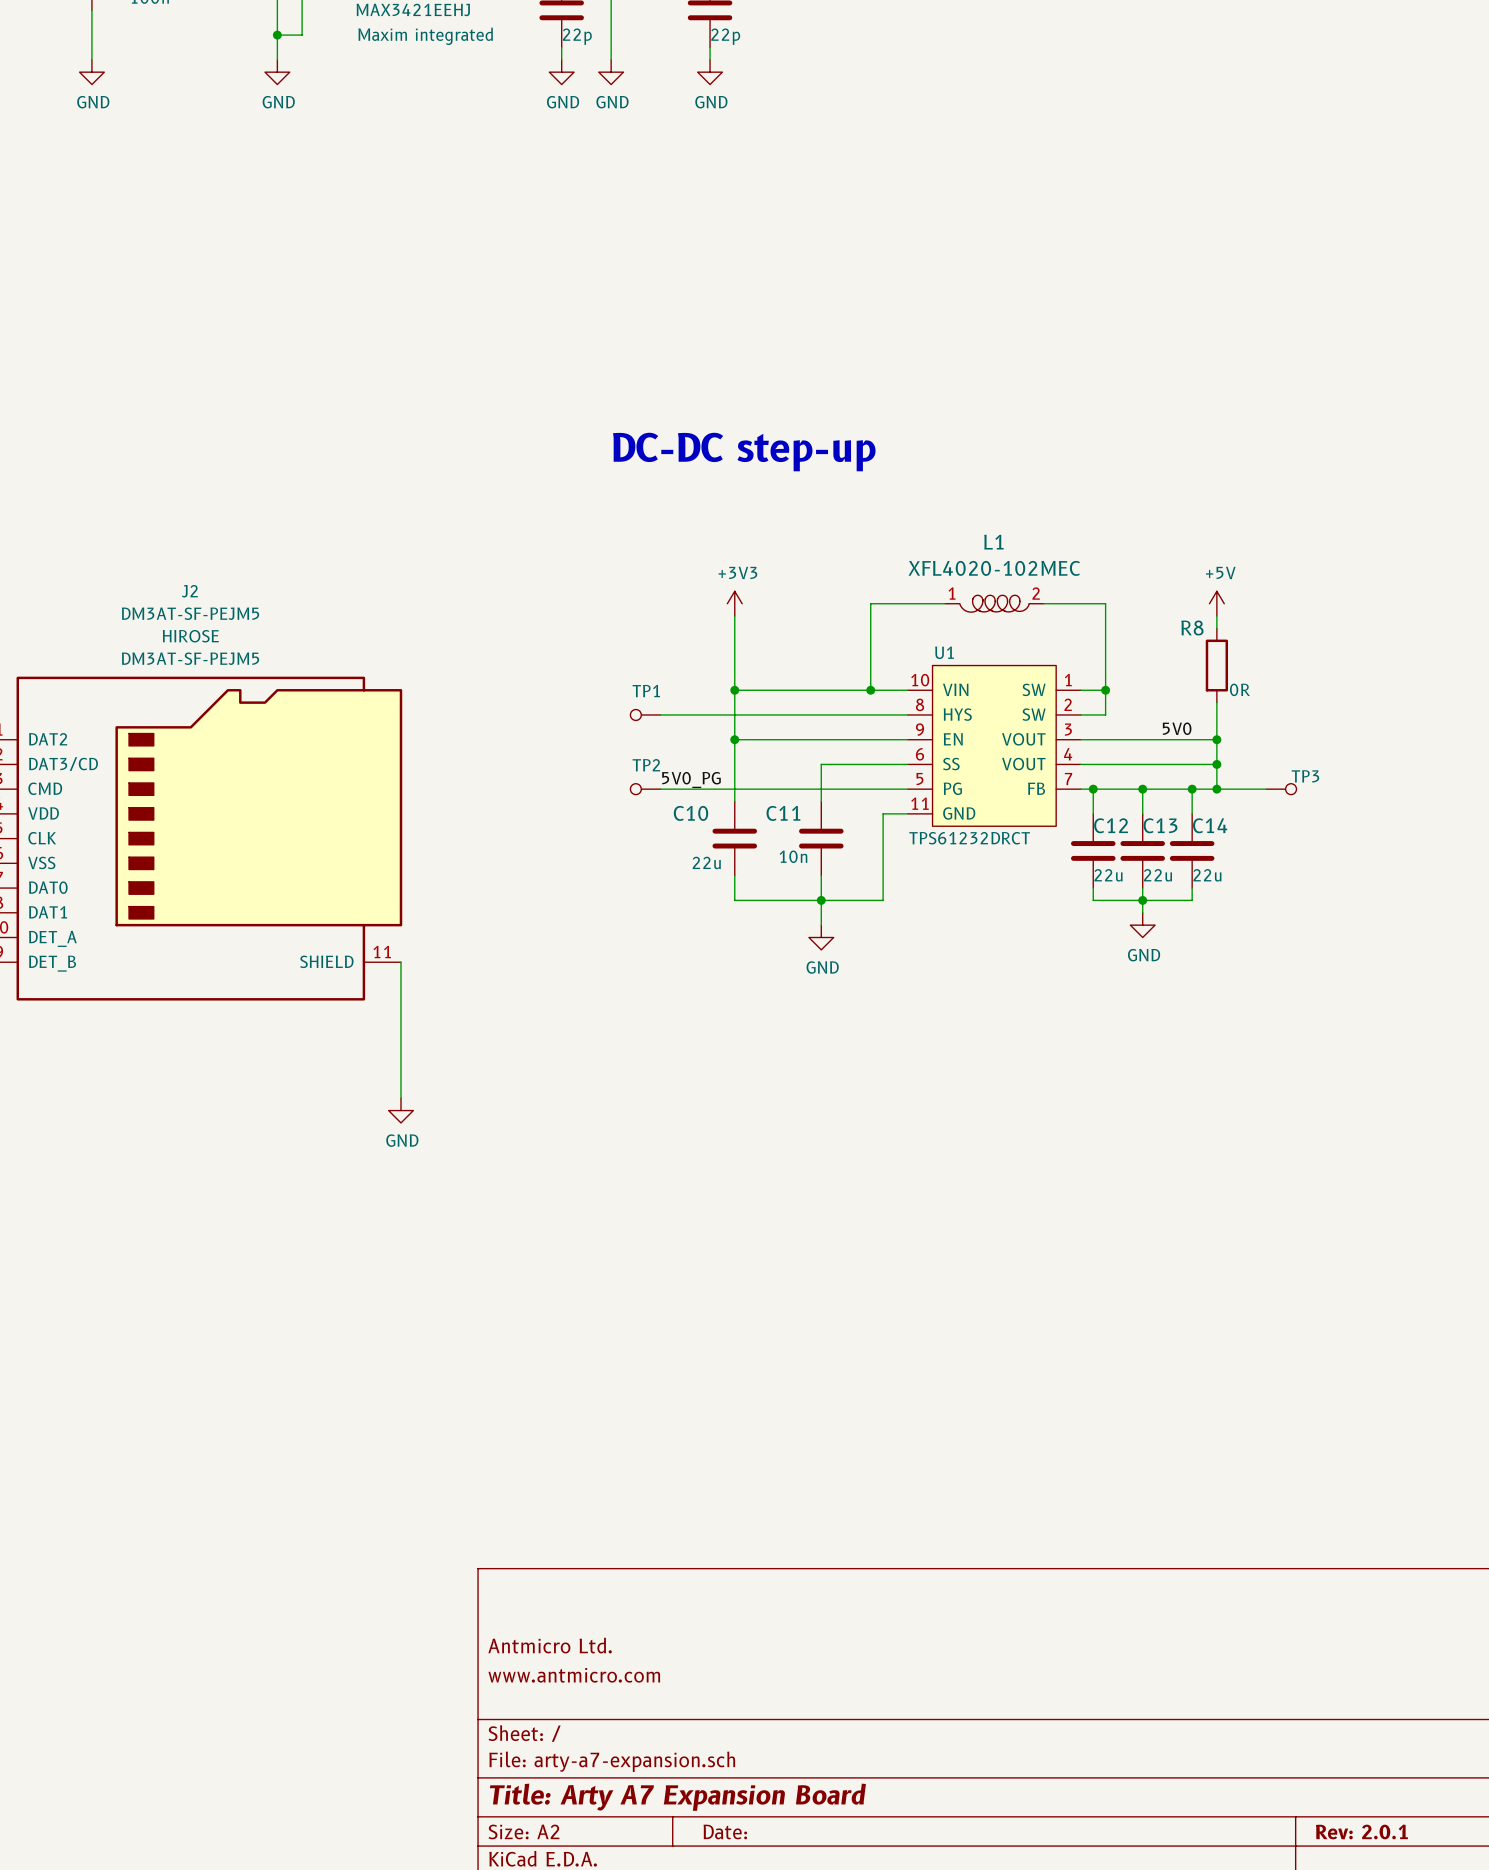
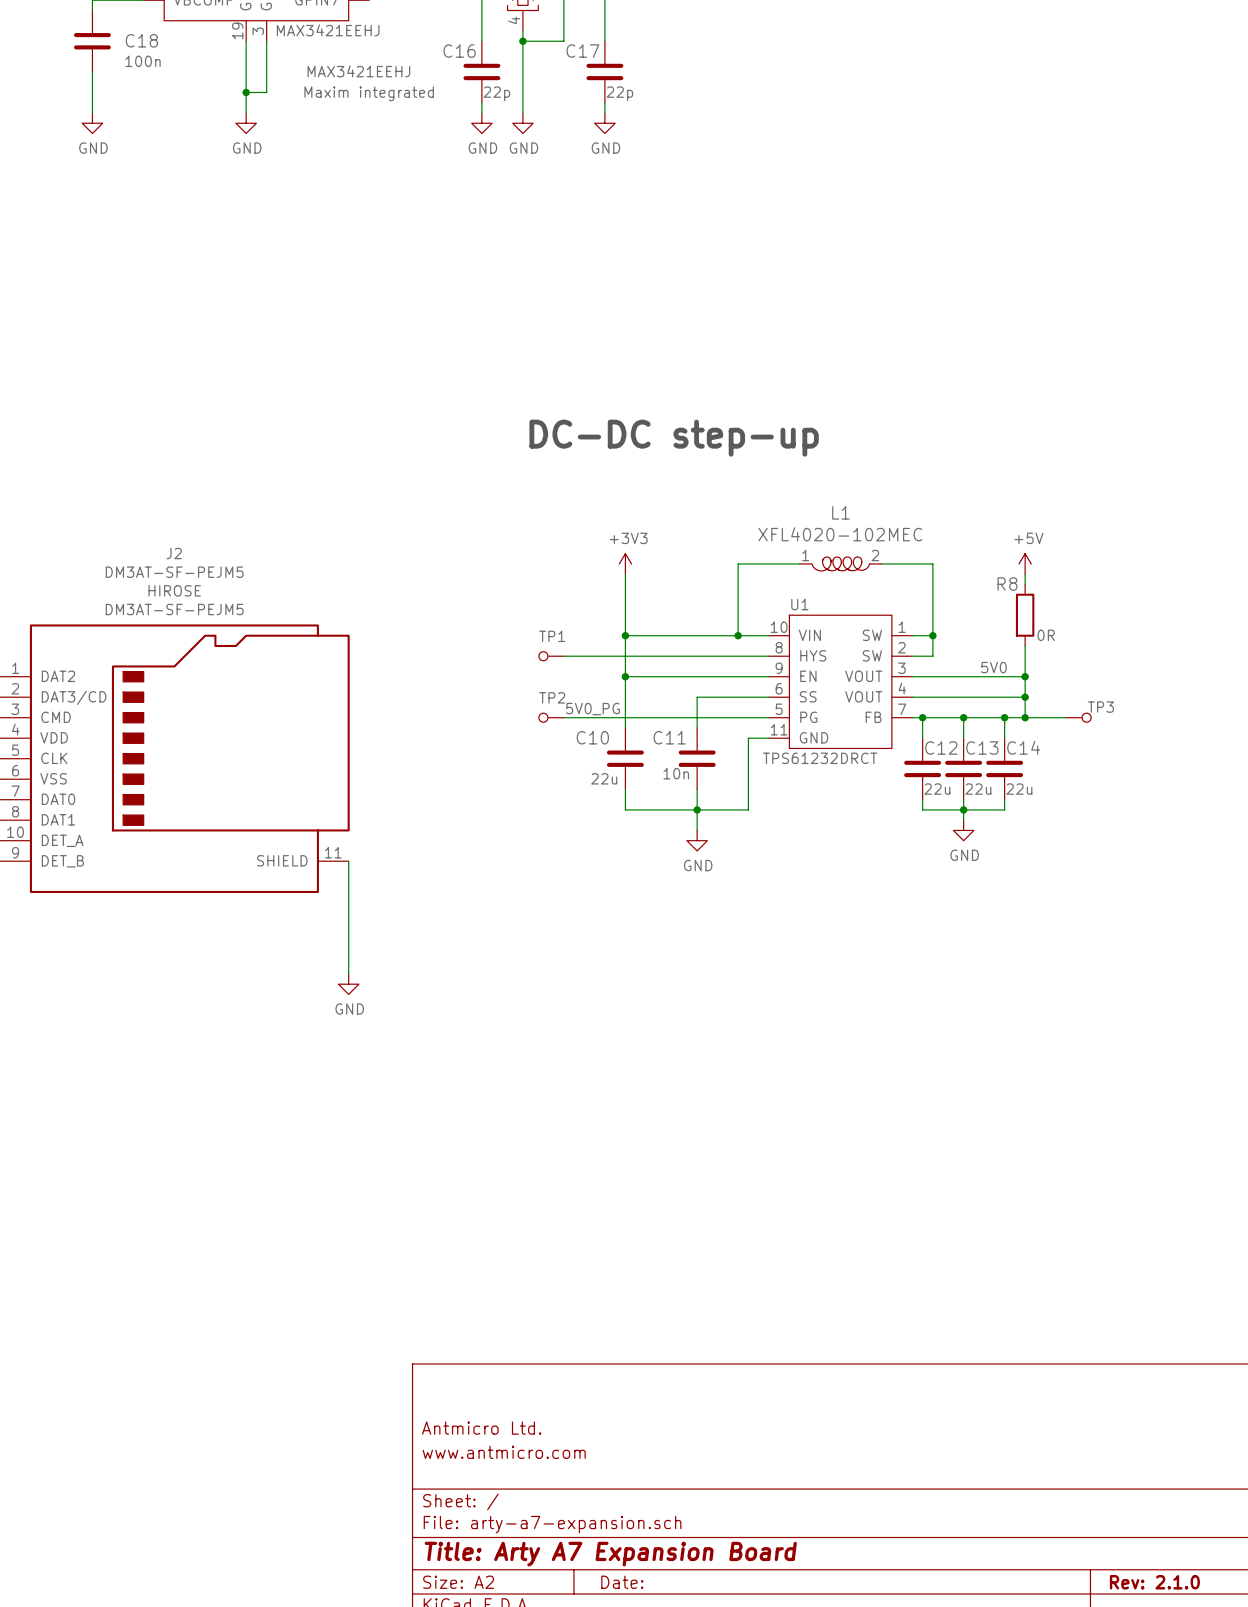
title block: Rev: 2.0.1 (1361, 1831) -> Rev: 2.1.0 (1154, 1582)

